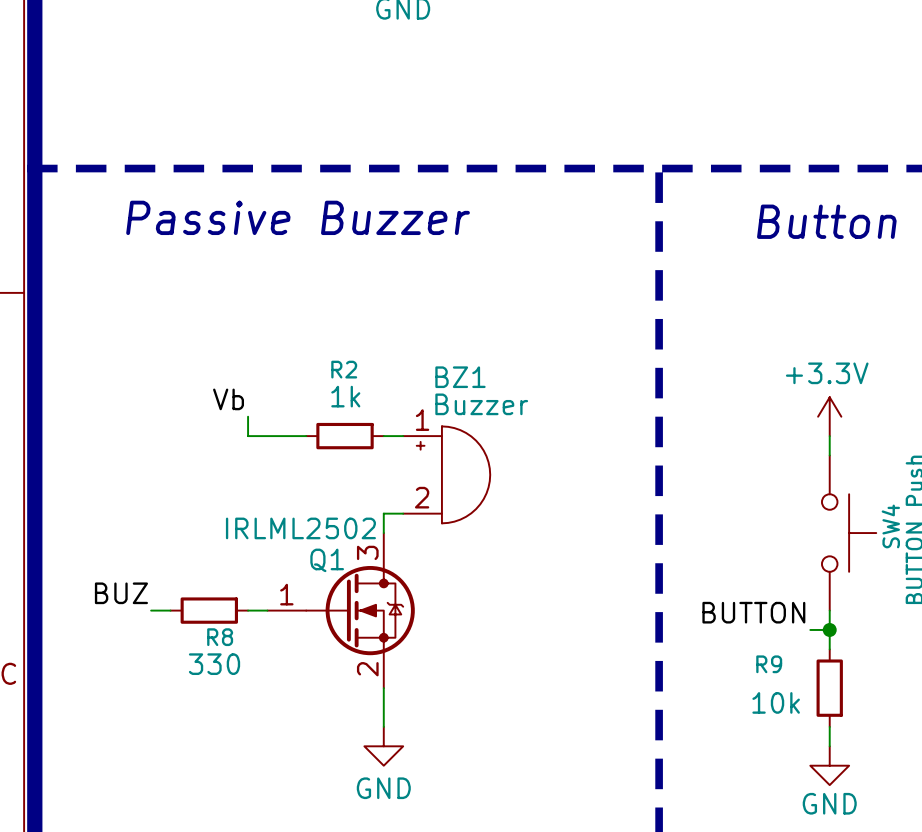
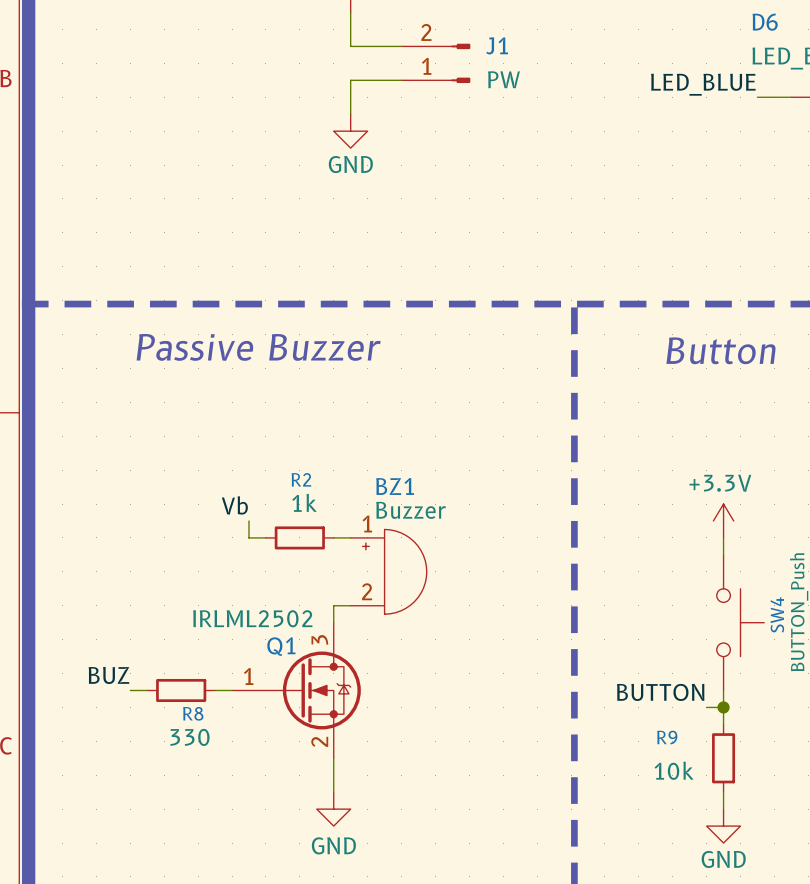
label position: Vb (228, 399) -> Vb (234, 505)
wire: (248, 416) (248, 436) (286, 436) -> (248, 521) (248, 537)

